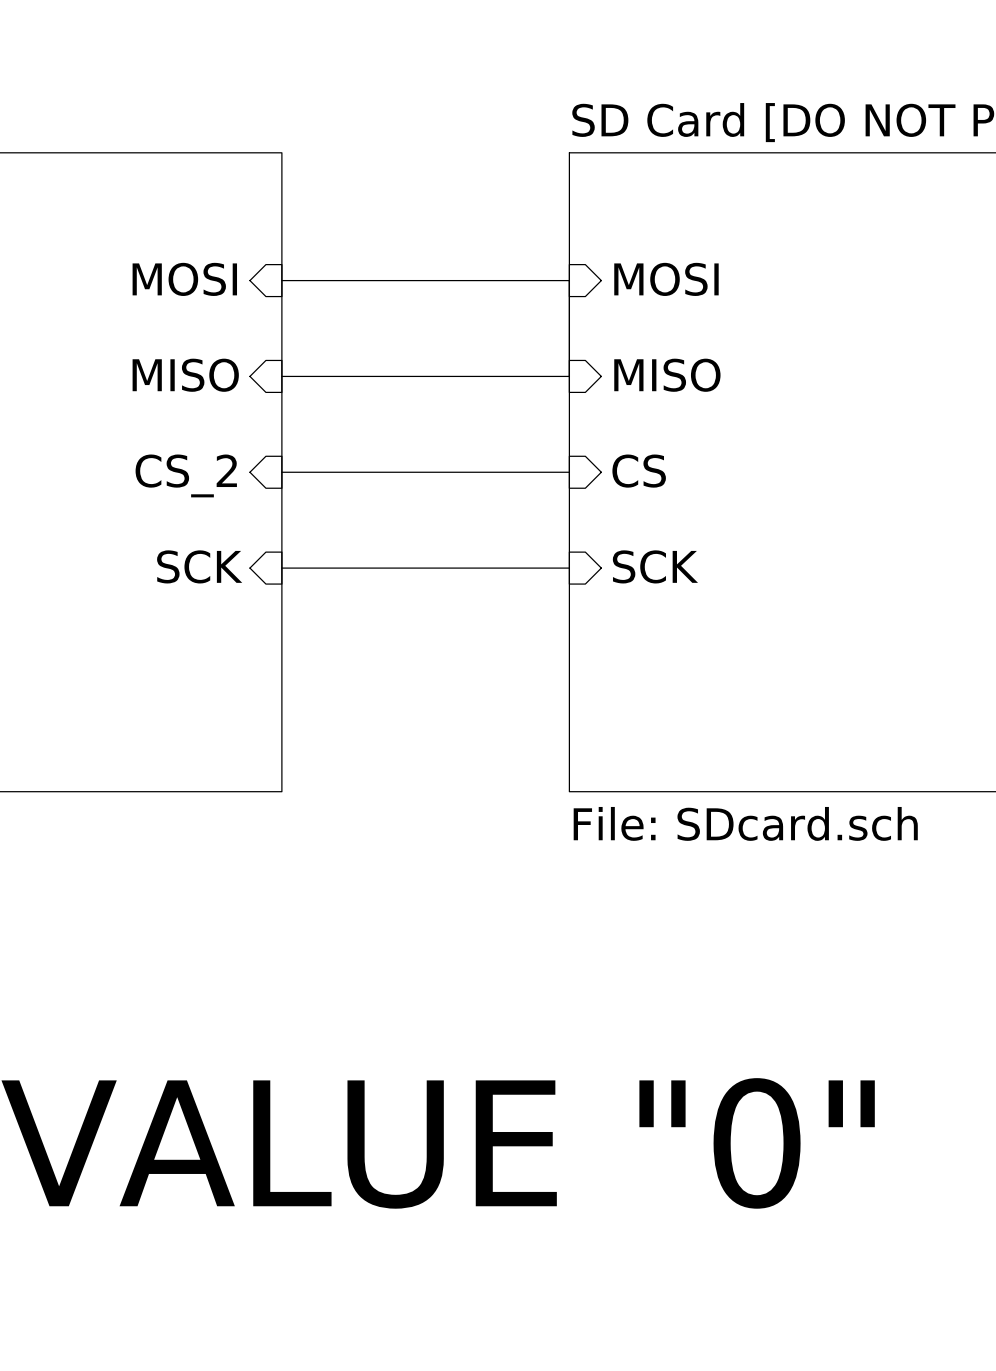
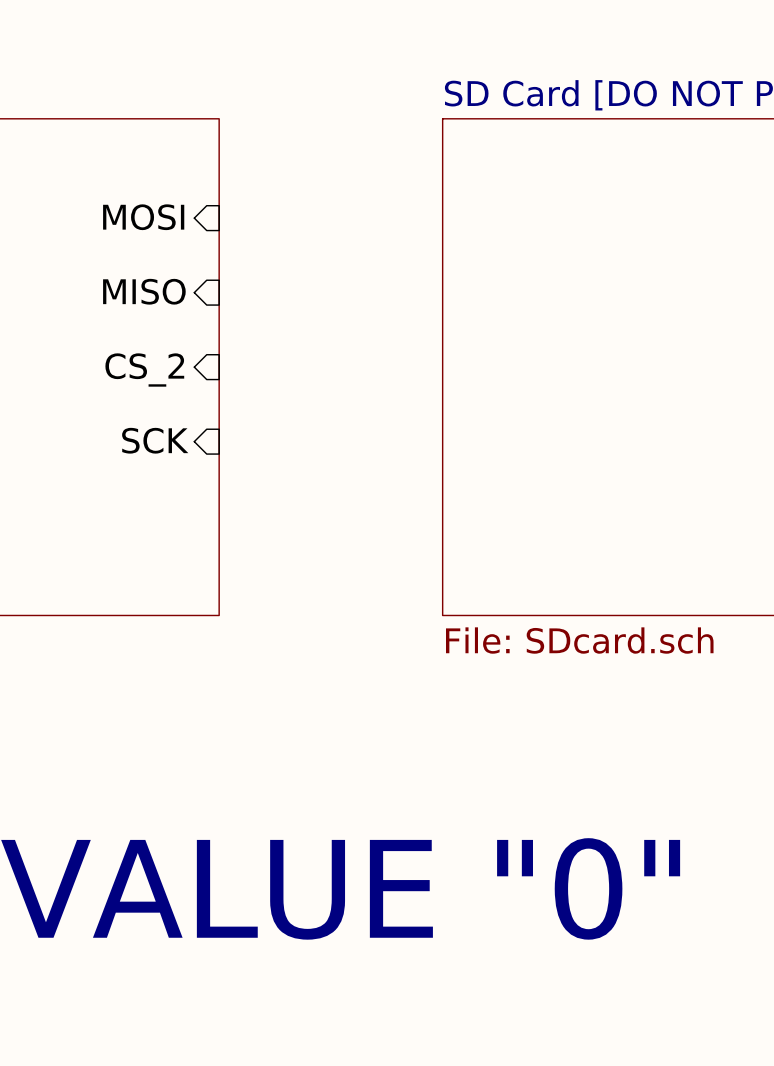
sheet pin: MOSI (666, 279) -> none
wire: (281, 280) (569, 280) (569, 376) (281, 376) -> none
sheet pin: MISO (667, 375) -> none
sheet pin: CS (639, 471) -> none
wire: (281, 472) (569, 472) -> none
sheet pin: SCK (655, 566) -> none
wire: (281, 568) (569, 568) -> none

